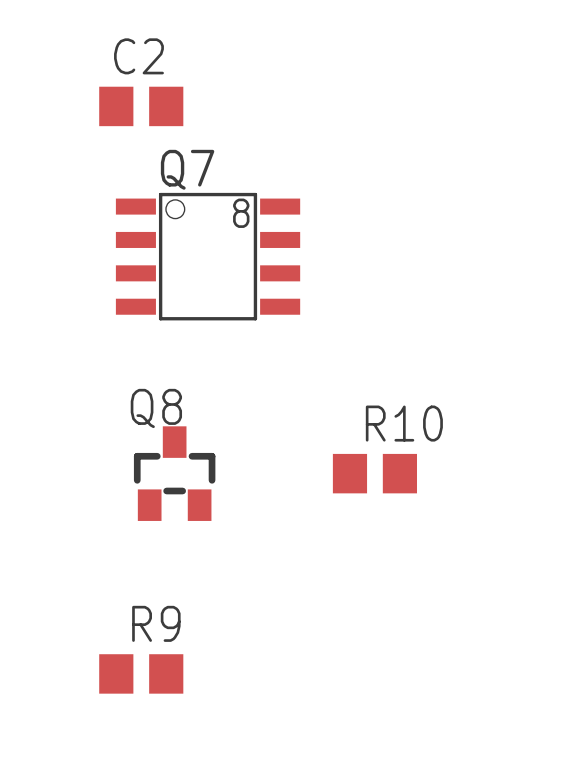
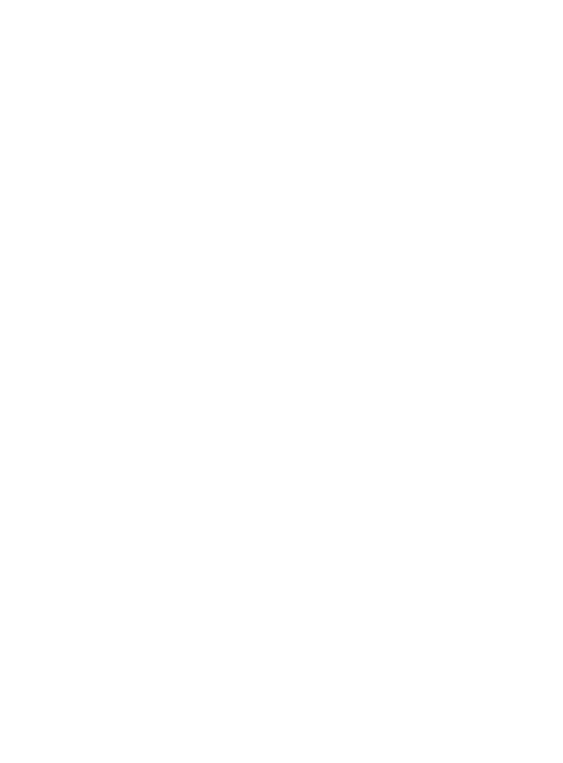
C2: (141, 106) -> none
Q7: (208, 256) -> none
Q8: (174, 473) -> none
R10: (374, 473) -> none
R9: (141, 673) -> none

